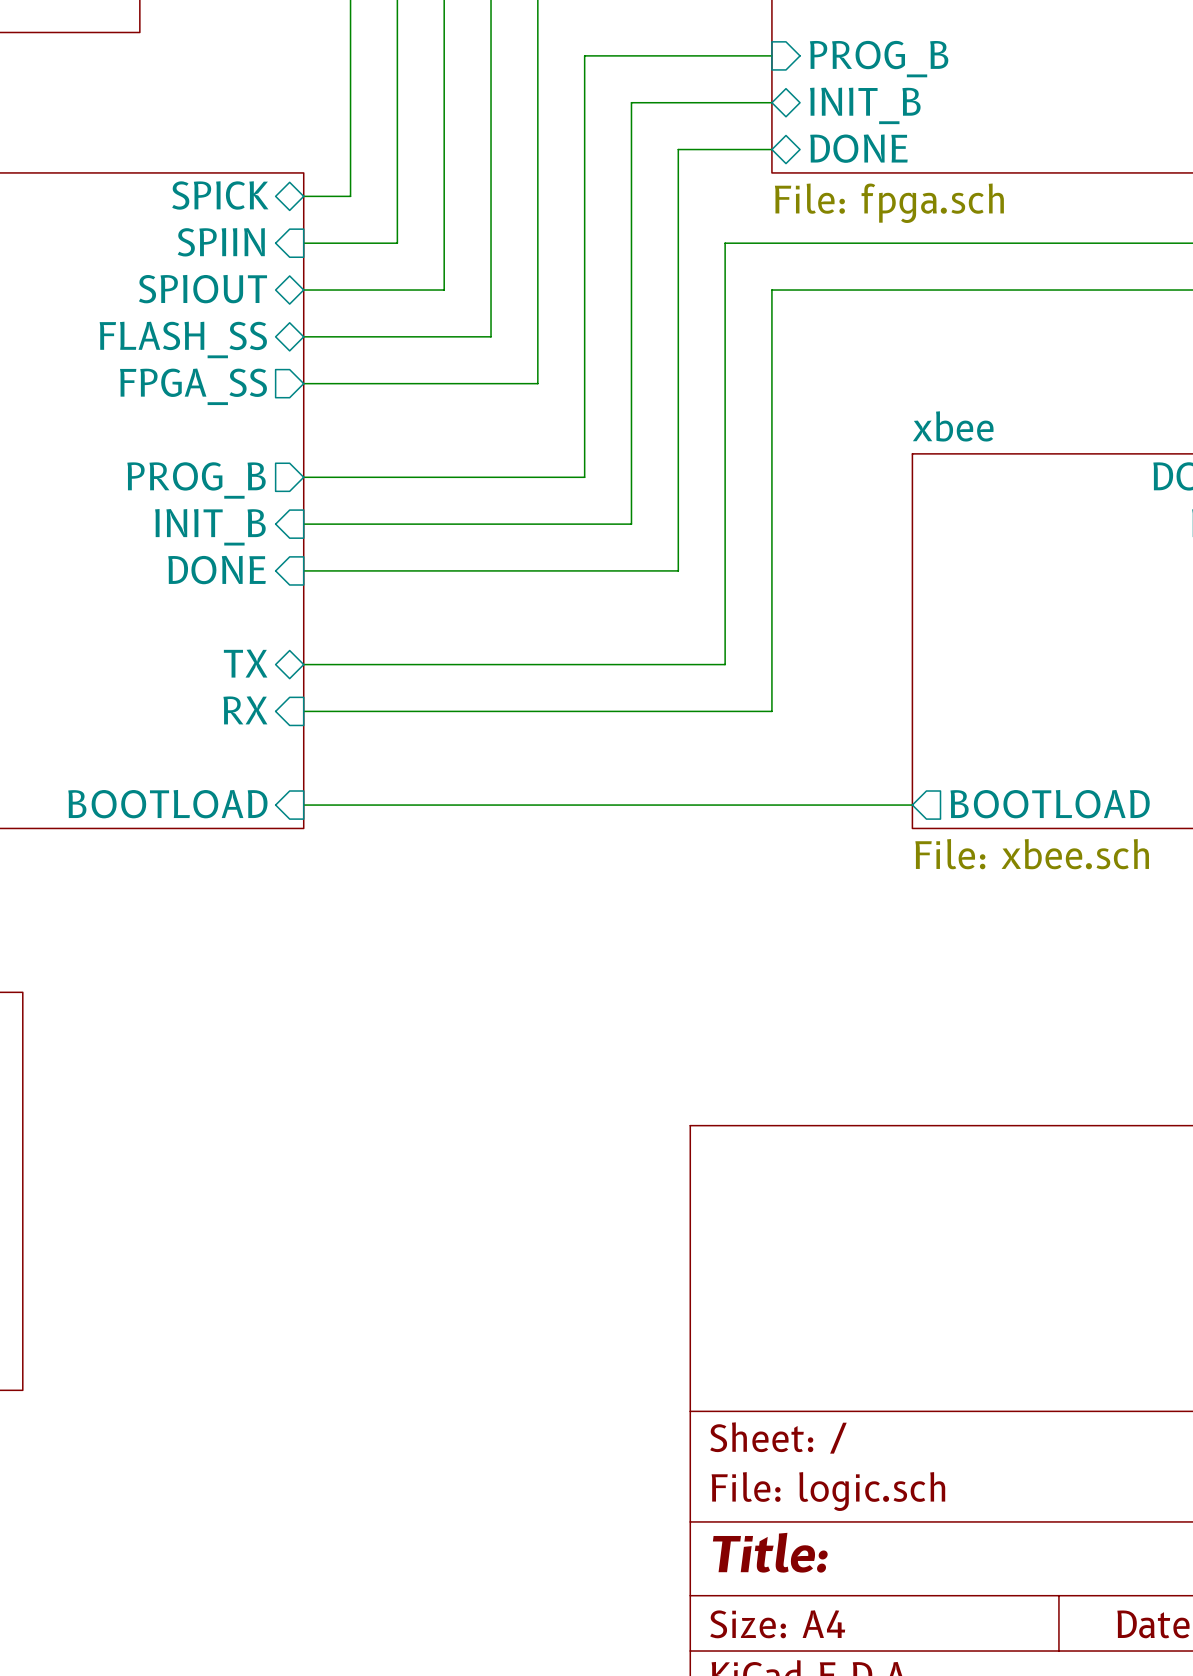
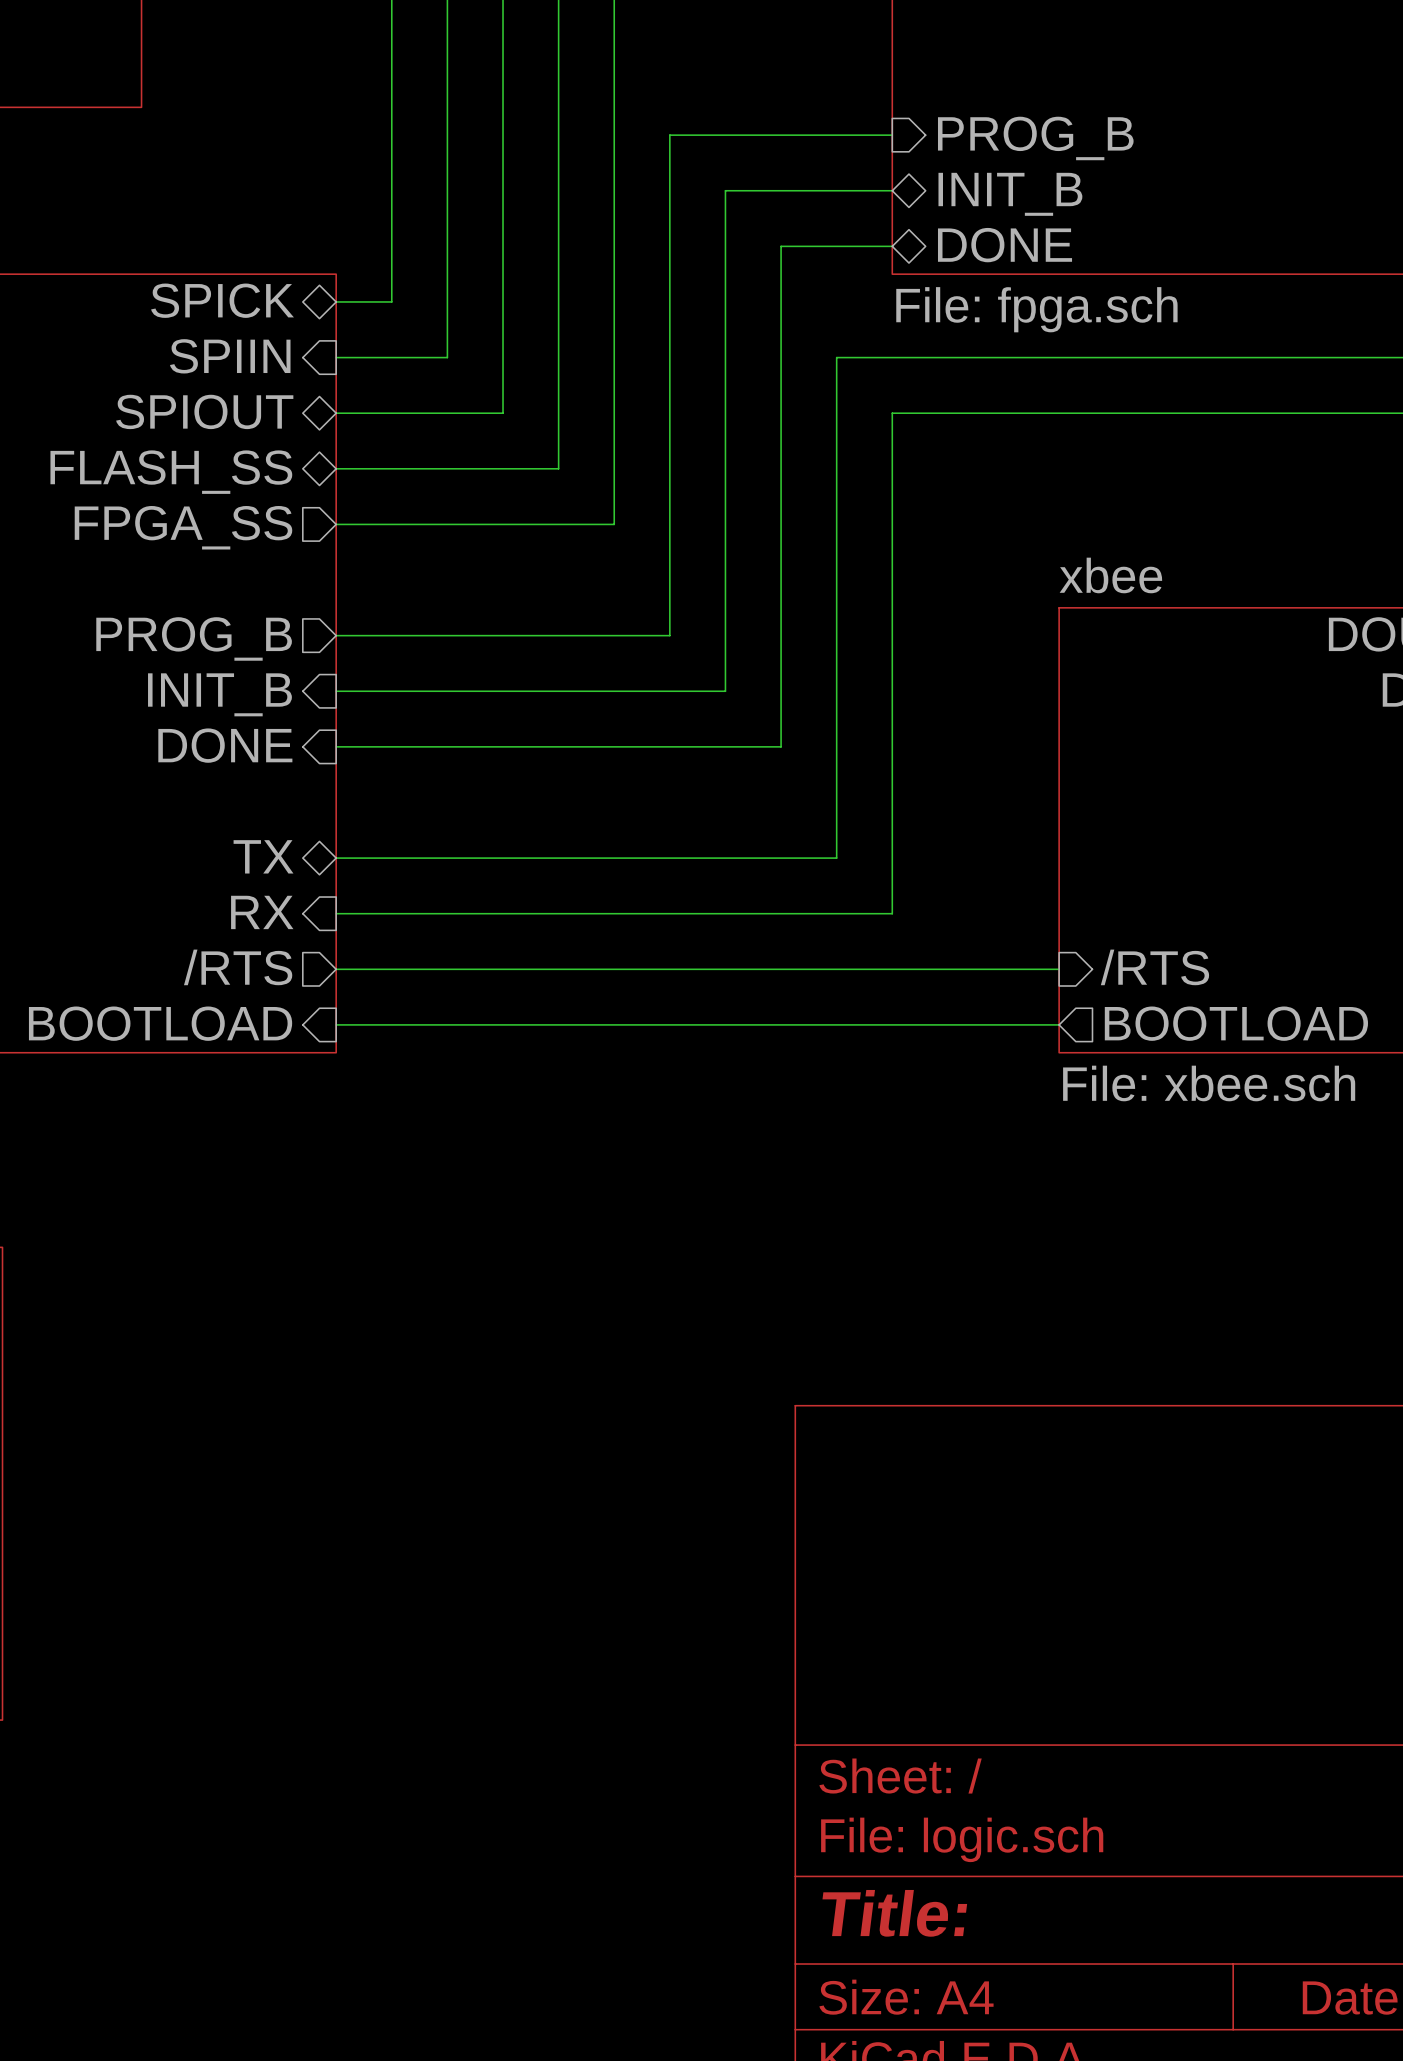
sheet pin: none -> /RTS (238, 967)
sheet pin: none -> /RTS (1154, 967)
wire: none -> (336, 969) (1059, 969)

